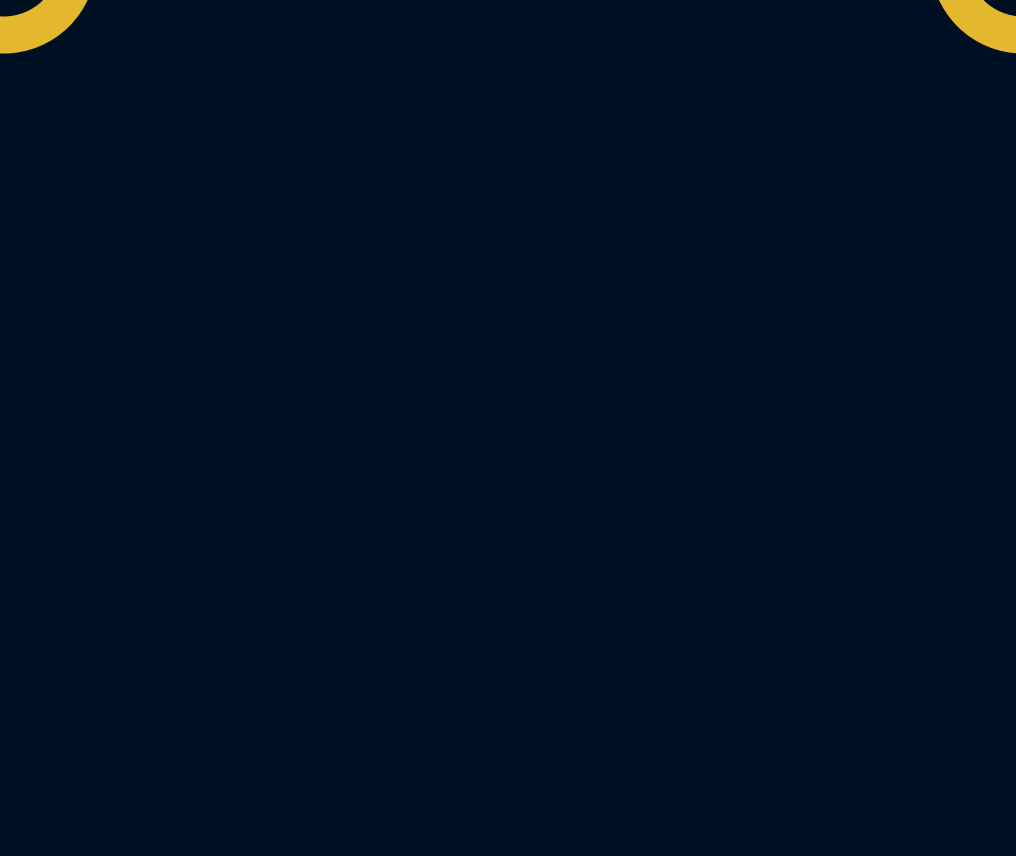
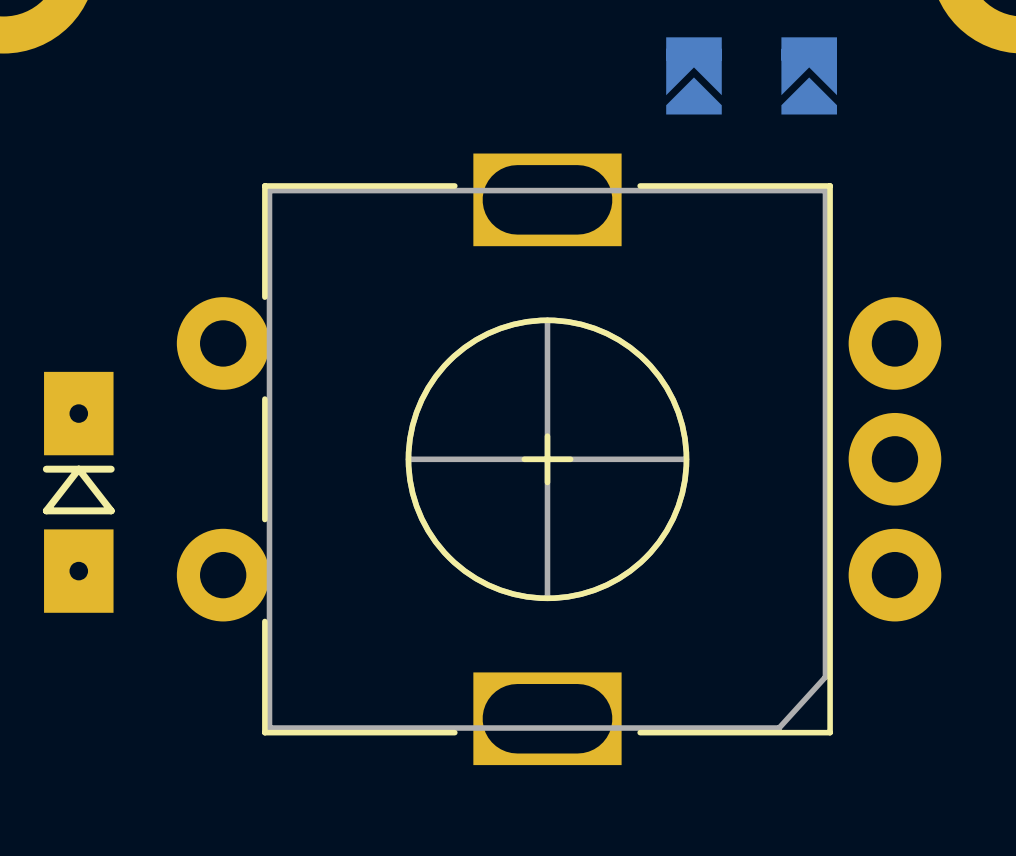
part: none -> (693, 75)
part: none -> (809, 75)
part: none -> (559, 459)
part: none -> (78, 492)

